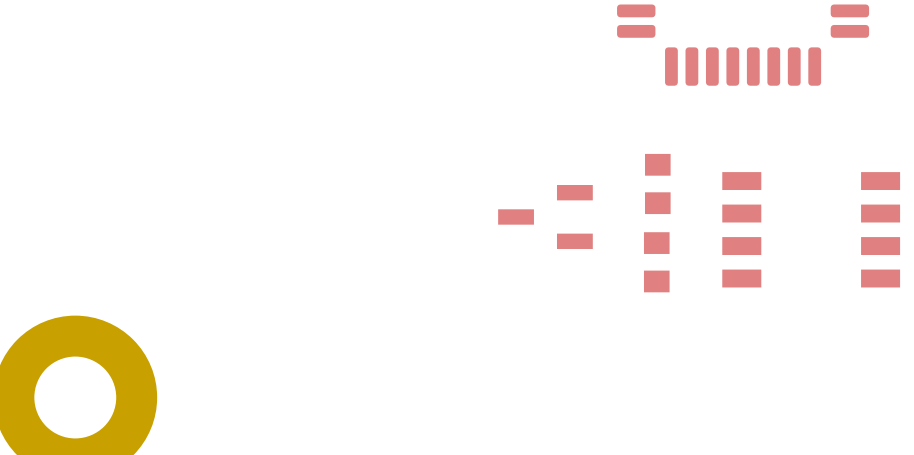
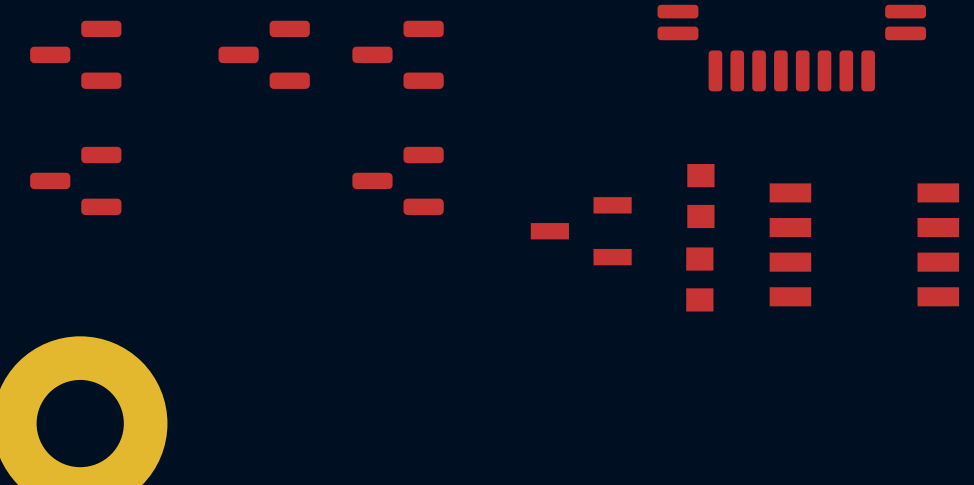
part: none -> (75, 54)
part: none -> (264, 54)
part: none -> (398, 54)
part: none -> (75, 180)
part: none -> (398, 180)

